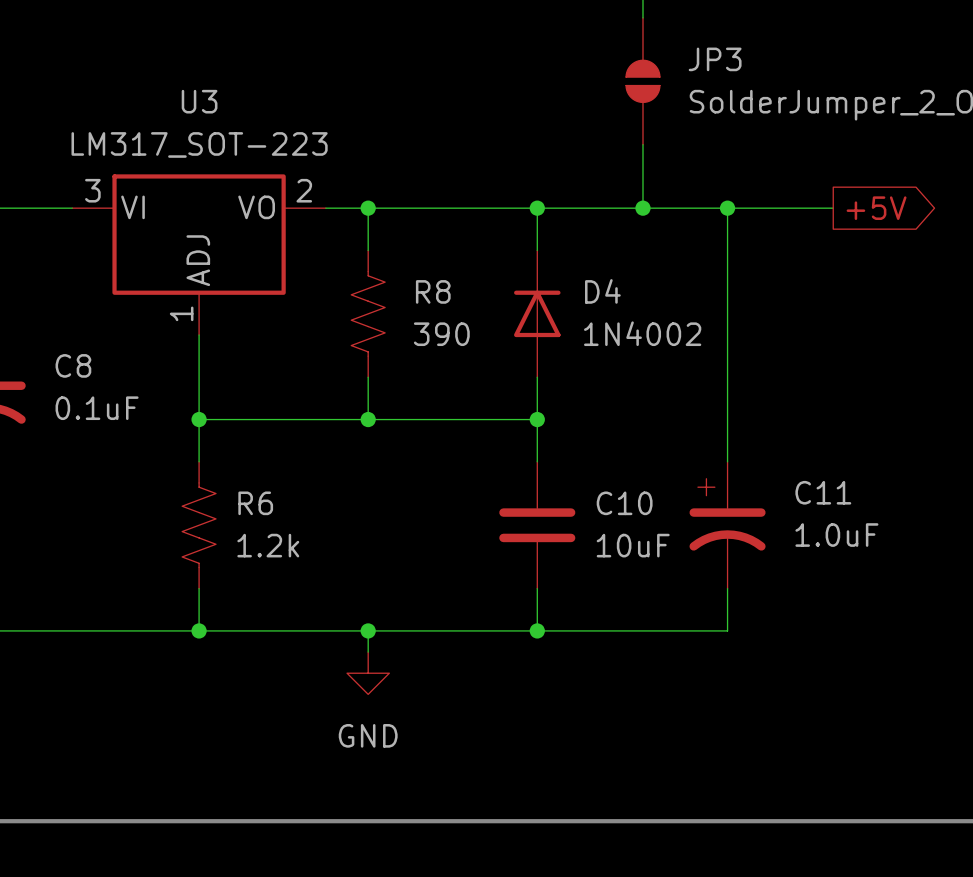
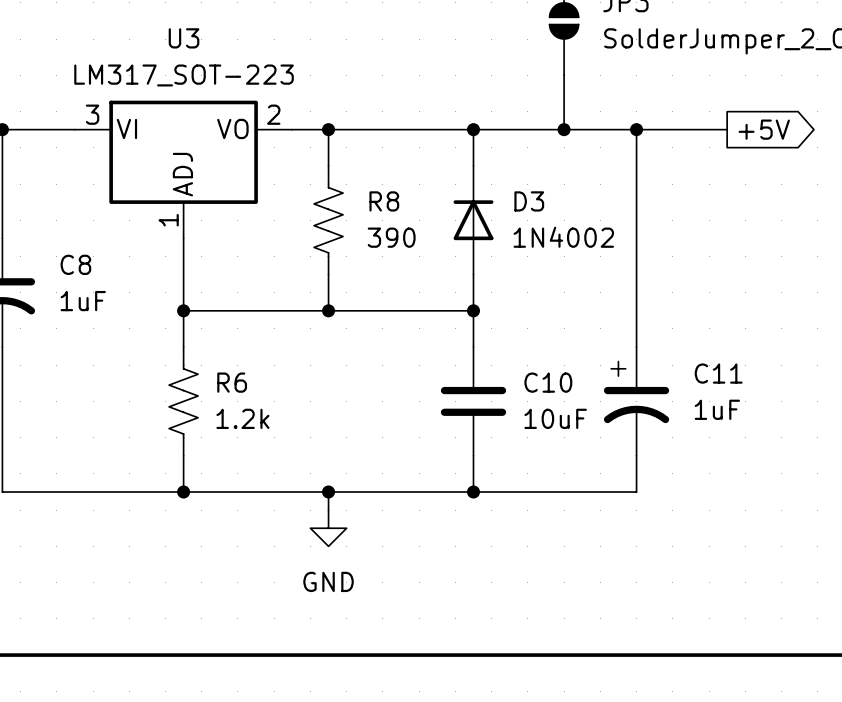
D4 name: D4 (602, 291) -> D3 (529, 201)
C8 value: 0.1uF (97, 408) -> 1uF (83, 301)
C11 value: 1.0uF (836, 535) -> 1uF (717, 409)

